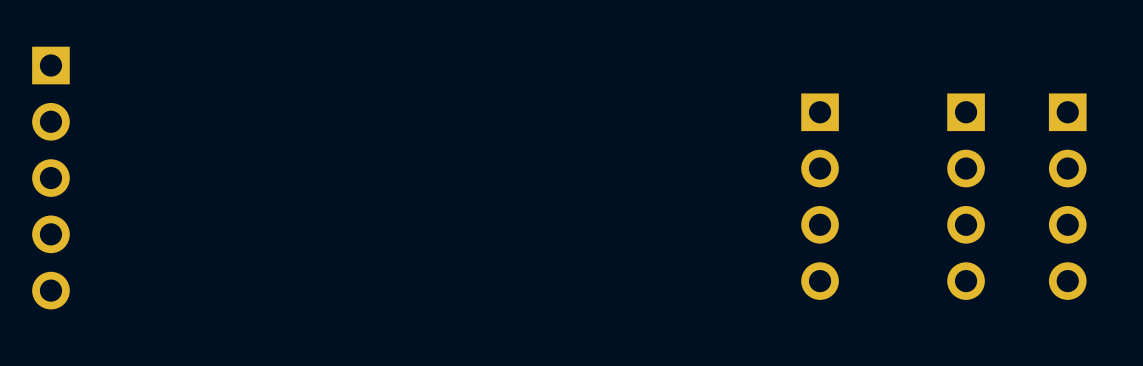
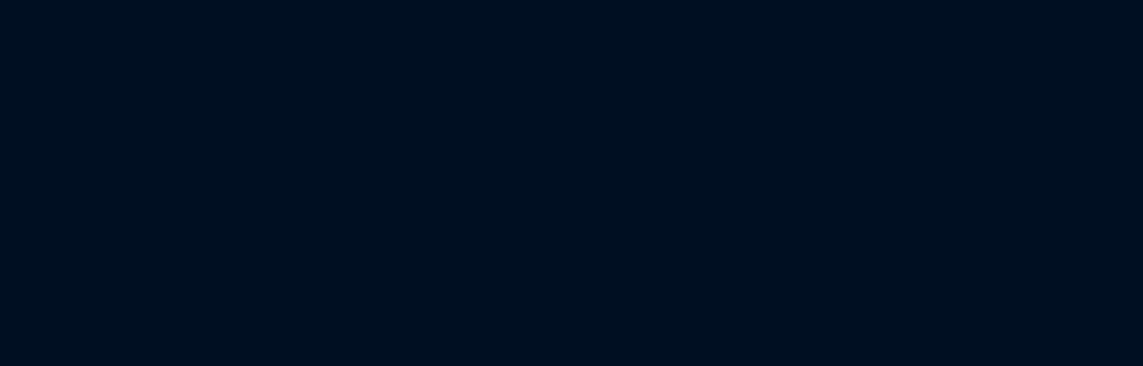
part: (50, 178) -> none
part: (820, 196) -> none
part: (966, 196) -> none
part: (1067, 196) -> none

